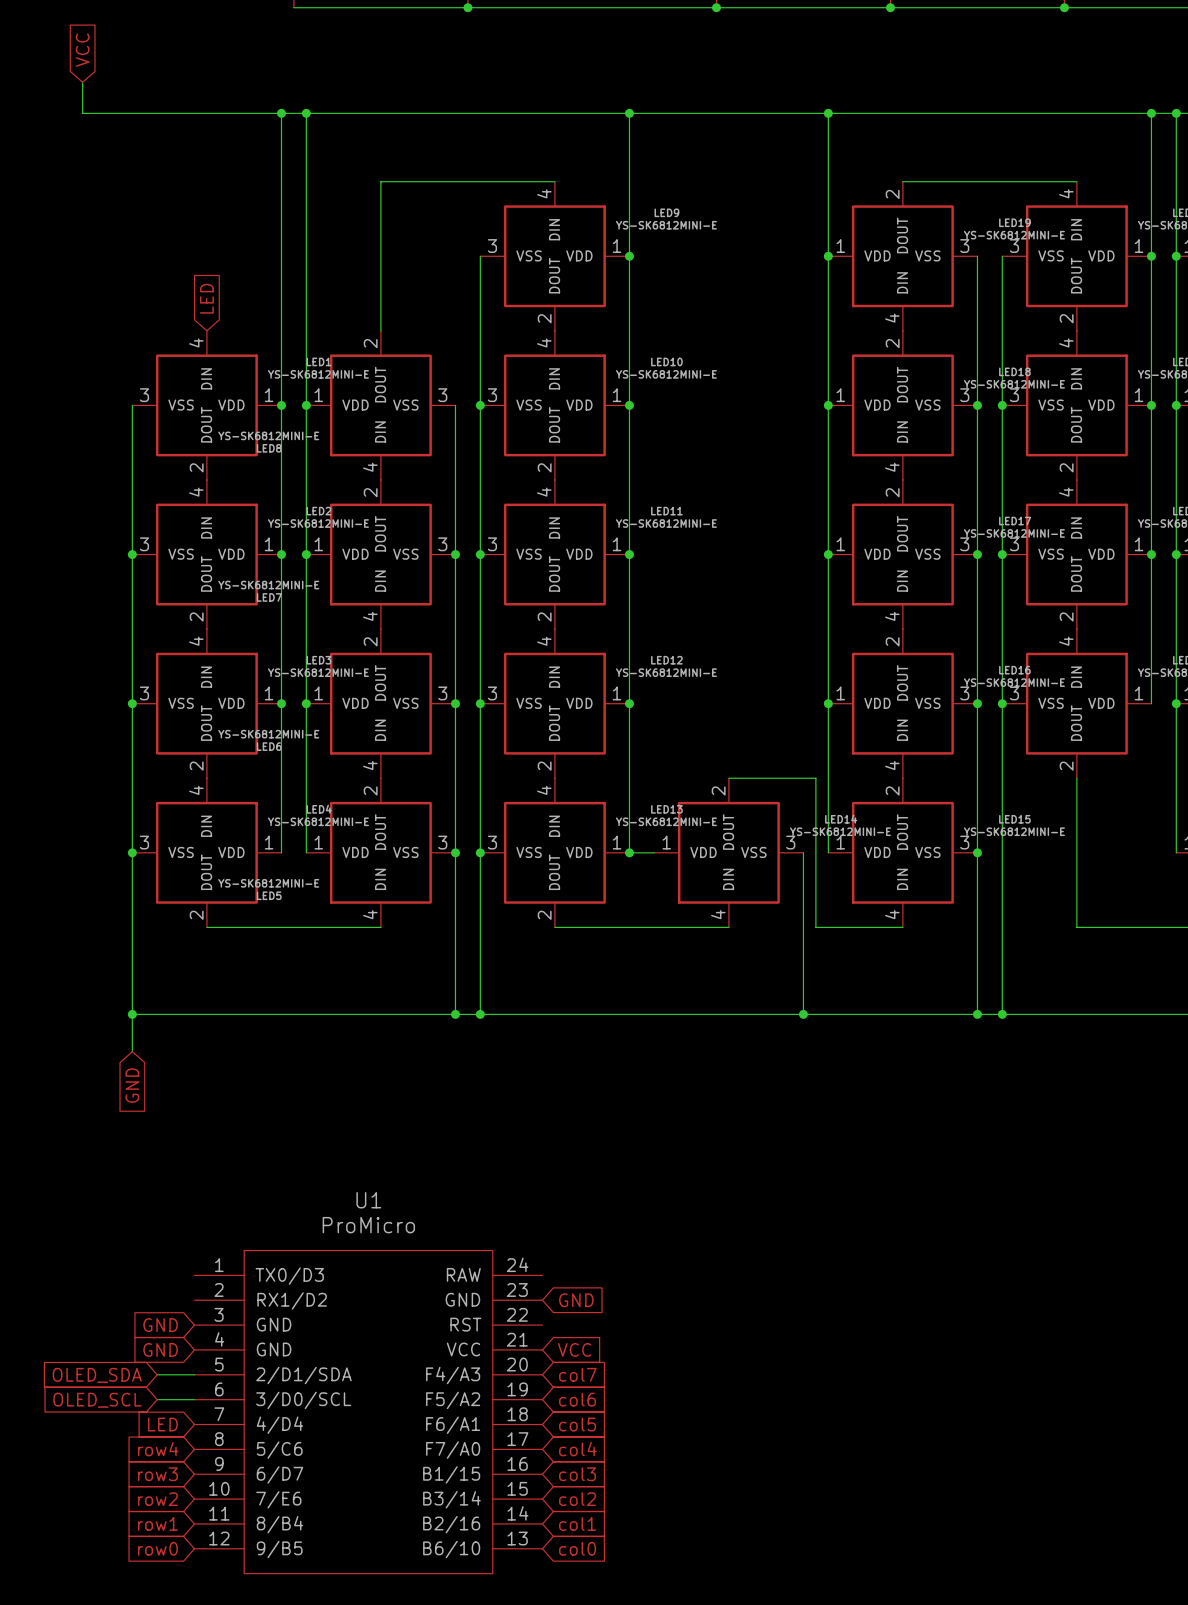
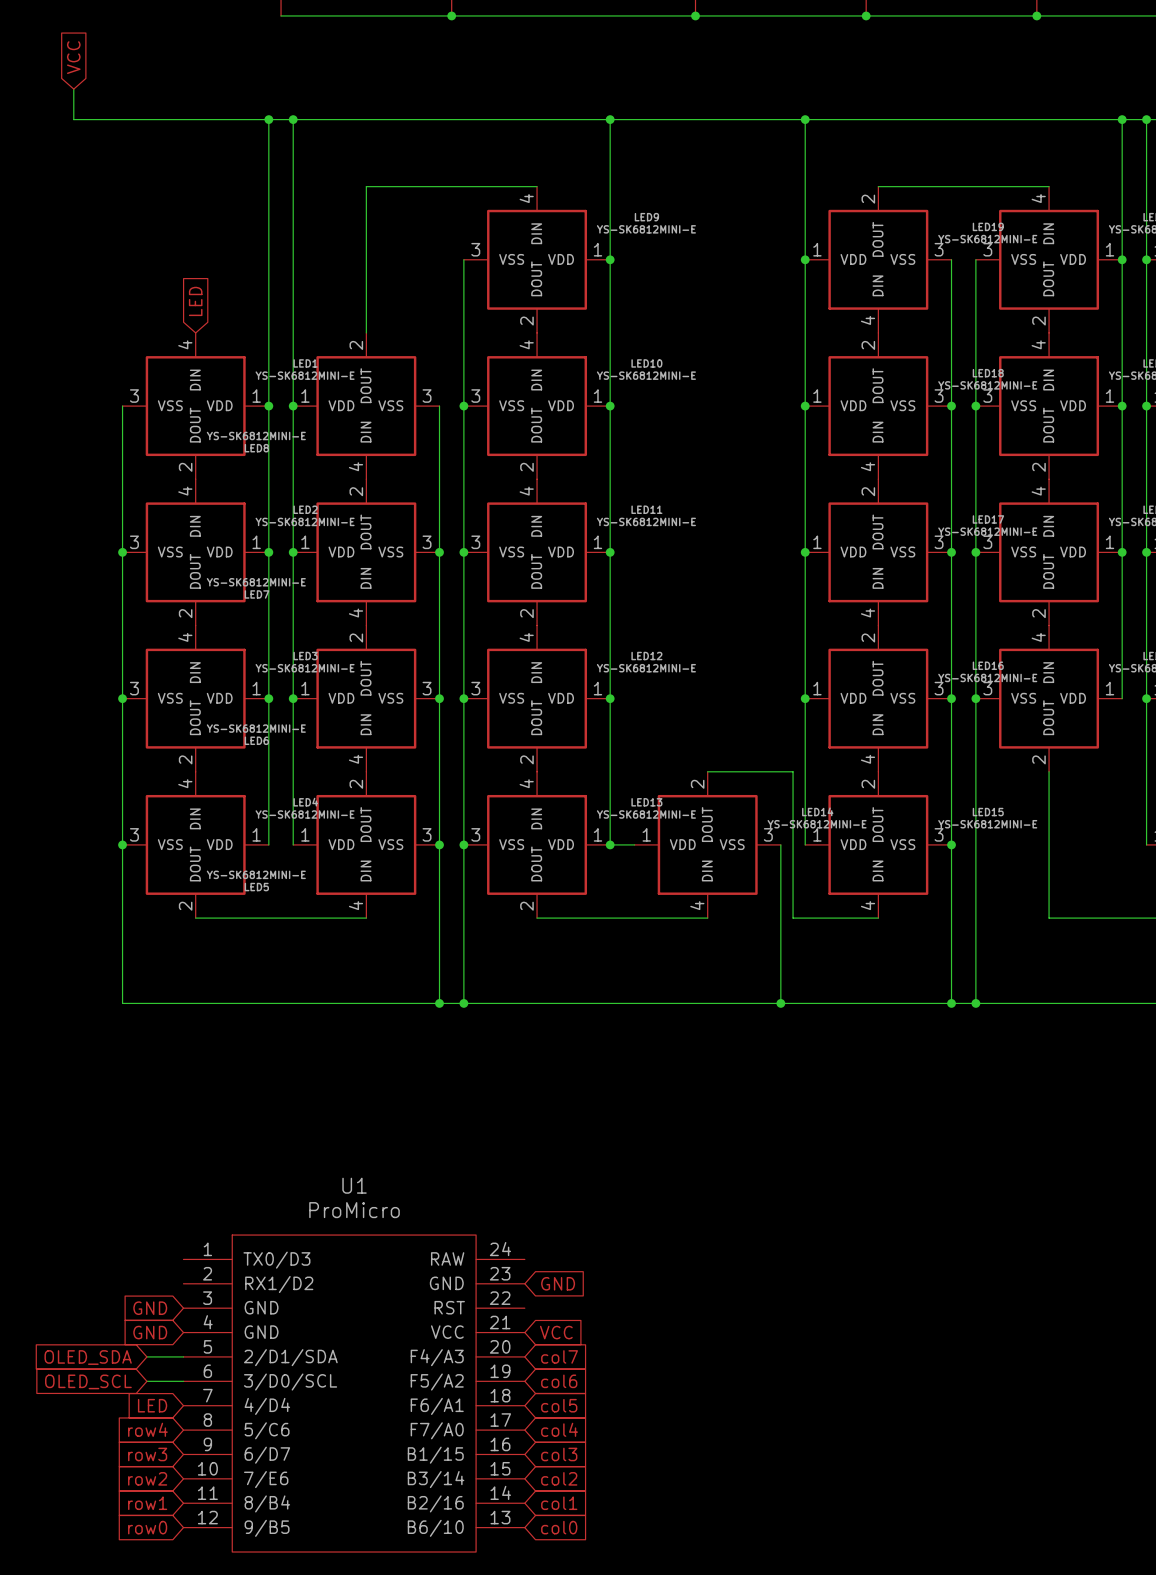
wire: (132, 1014) (132, 1051) -> none
junction: (132, 1014) -> none
global label: GND (132, 1085) -> none

